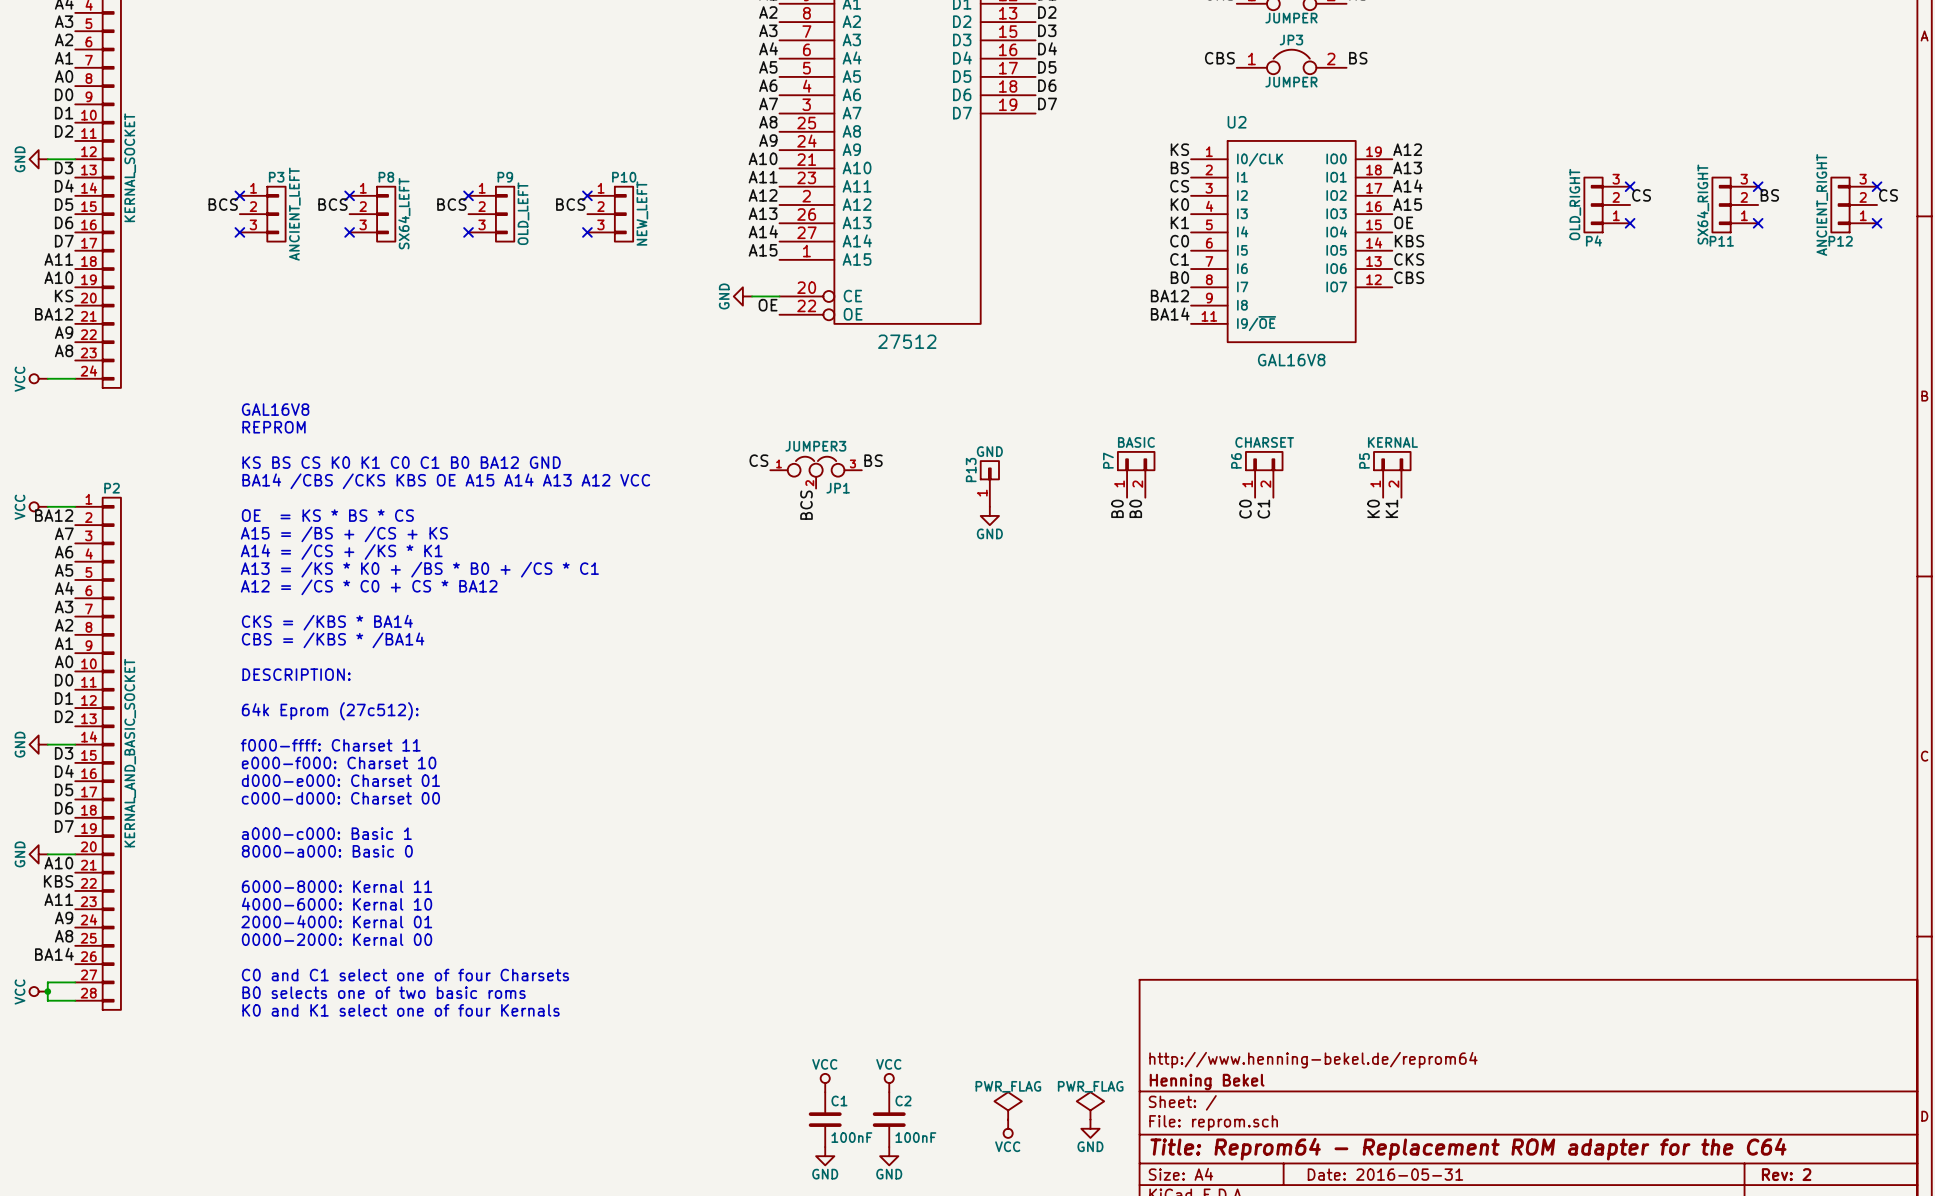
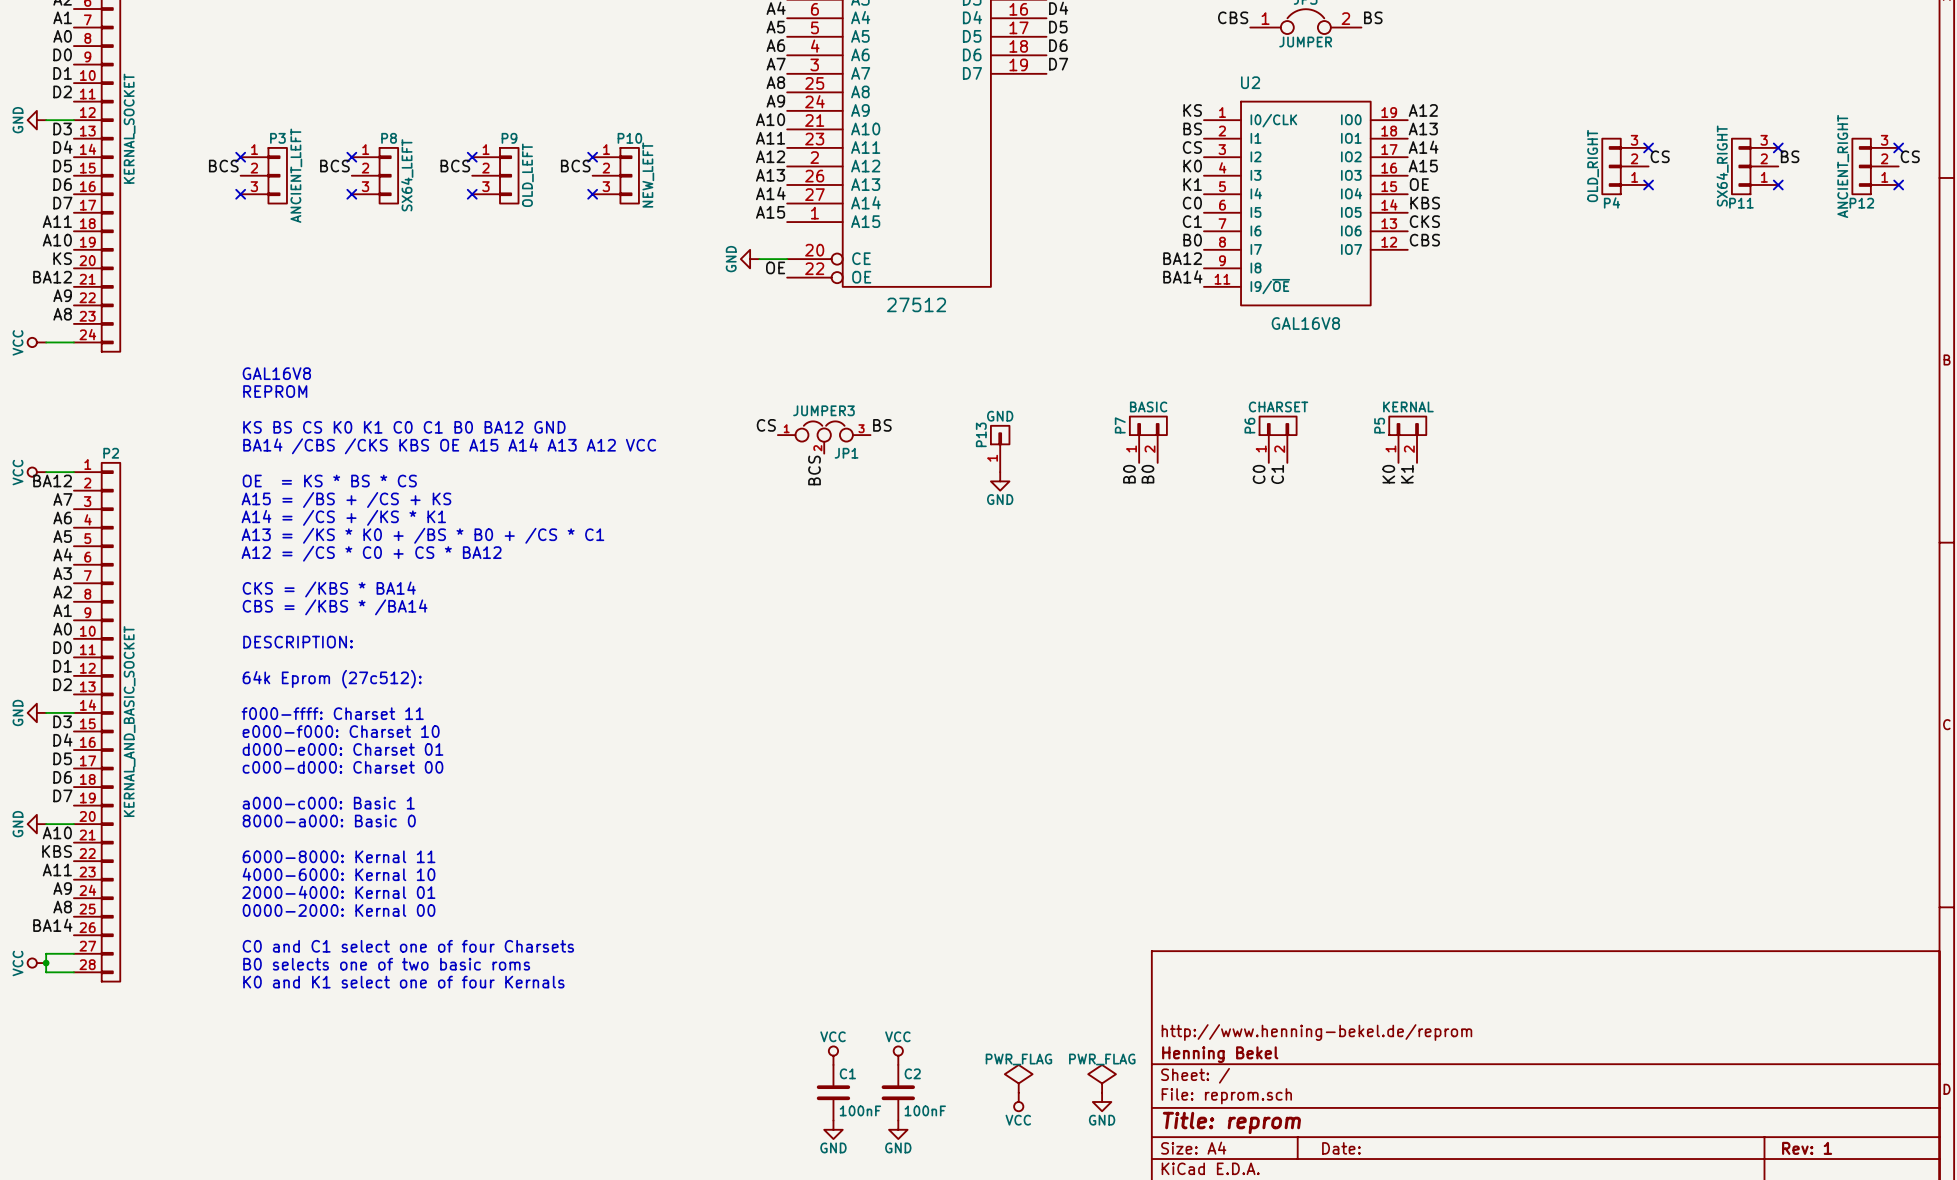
title block: http://www.henning-bekel.de/reprom64 (1313, 1060) -> http://www.henning-bekel.de/reprom (1316, 1032)
title block: Title: Reprom64 - Replacement ROM adapter for the C64 (1468, 1149) -> Title: reprom (1231, 1122)
title block: Date: 2016-05-31 (1385, 1174) -> Date: (1341, 1148)
title block: Rev: 2 (1786, 1174) -> Rev: 1 (1807, 1148)

